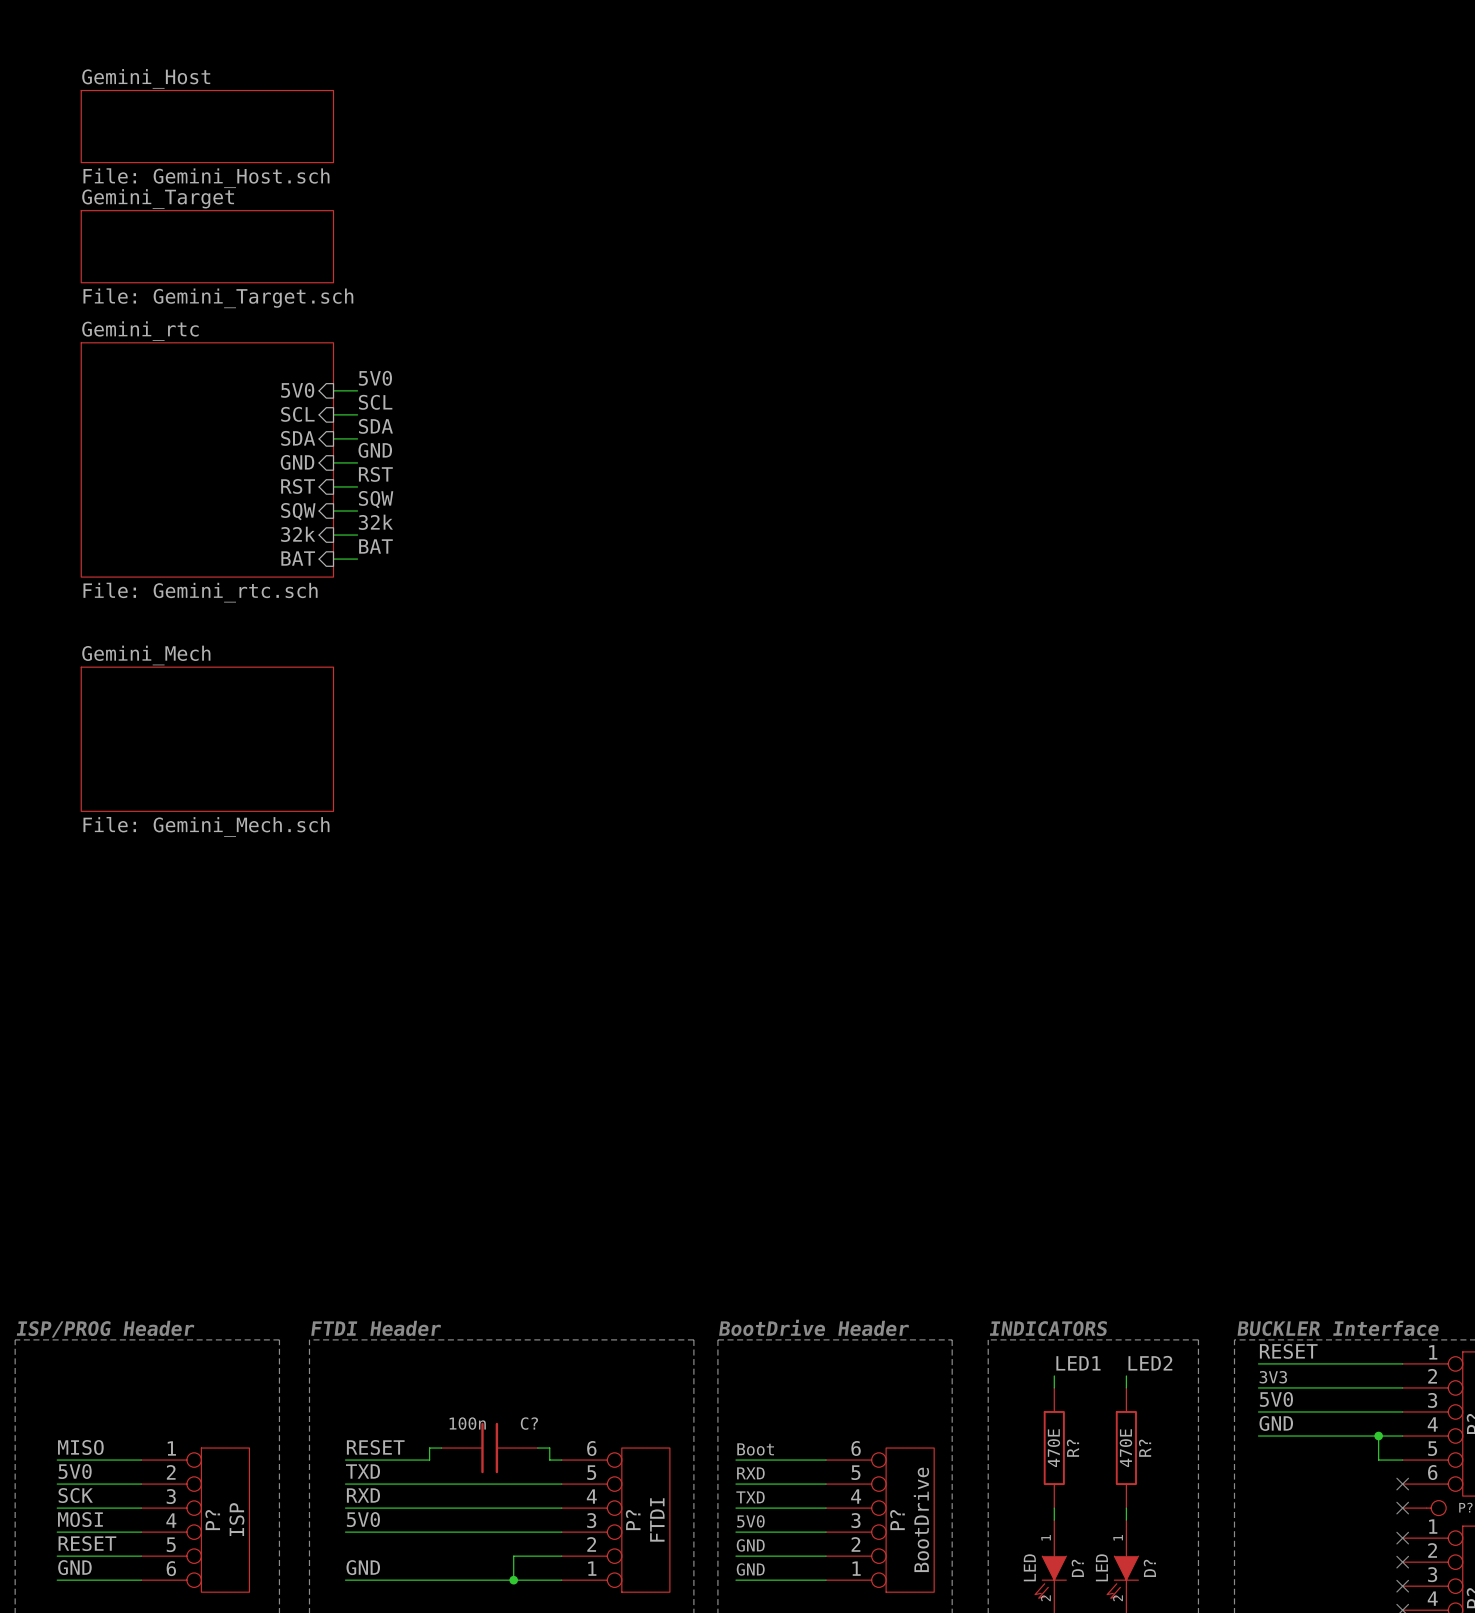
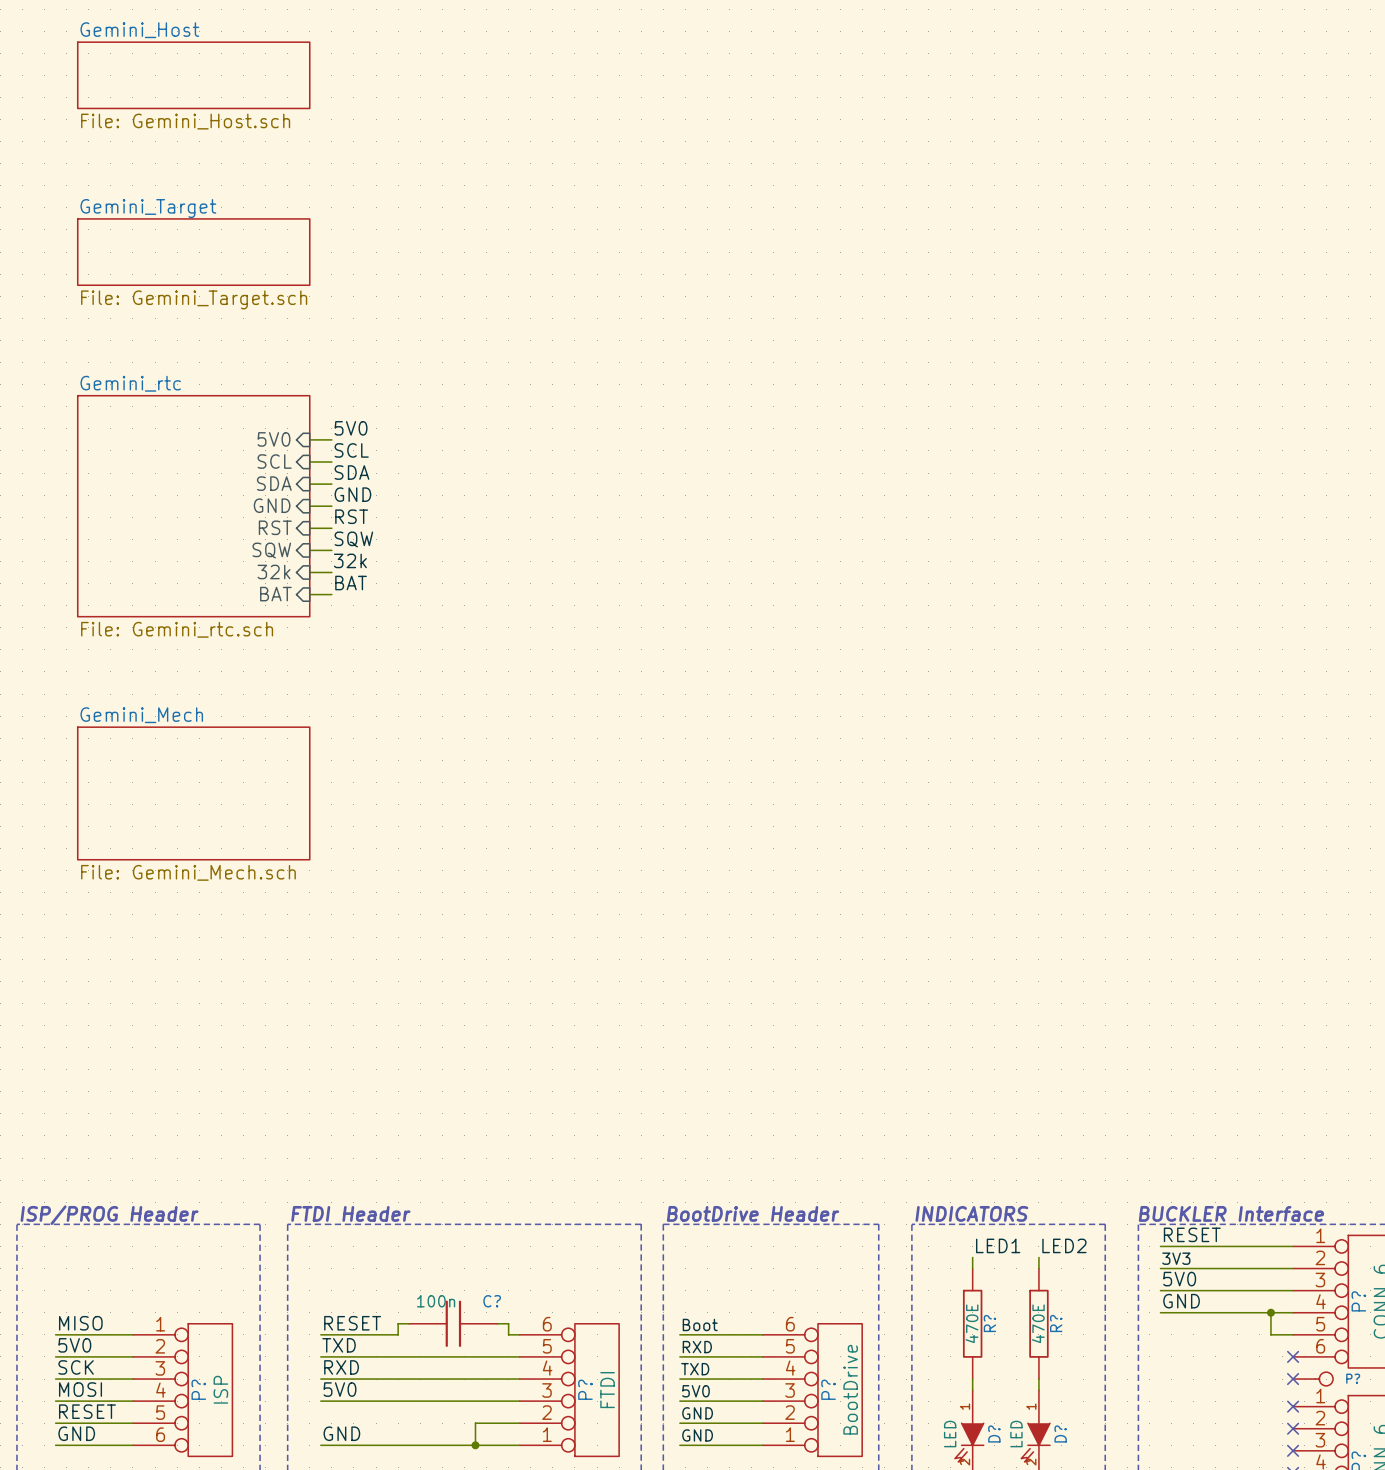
sheet Gemini_Host position: (207, 126) -> (193, 75)
sheet Gemini_Target position: (207, 246) -> (193, 252)
label: 5V0 (375, 378) -> none
sheet pin: 5V0 (297, 390) -> none
wire: (333, 390) (357, 390) -> (309, 528) (331, 528)
label: SCL (375, 402) -> none
sheet pin: SCL (297, 414) -> none
wire: (333, 414) (357, 414) -> (309, 550) (331, 550)
label: SDA (375, 426) -> none
sheet pin: SDA (298, 438) -> none
wire: (333, 438) (357, 438) -> (309, 572) (331, 572)
label: GND (375, 450) -> none
sheet Gemini_rtc: File: Gemini_rtc.sch (207, 459) -> none
sheet pin: GND (297, 462) -> none
wire: (333, 462) (357, 462) -> (309, 594) (331, 594)
label: RST (375, 474) -> 5V0 (351, 428)
sheet pin: RST (298, 486) -> 5V0 (274, 439)
label: SQW (376, 499) -> SCL (351, 450)
sheet pin: SQW (298, 511) -> SCL (274, 461)
label: 32k (375, 522) -> SDA (351, 472)
sheet pin: 32k (298, 534) -> SDA (274, 483)
label: BAT (375, 546) -> GND (352, 494)
sheet pin: BAT (298, 558) -> GND (272, 505)
sheet Gemini_rtc: none -> File: Gemini_rtc.sch (193, 506)
label: none -> RST (351, 516)
sheet pin: none -> RST (275, 527)
label: none -> SQW (353, 539)
sheet pin: none -> SQW (271, 550)
label: none -> 32k (350, 560)
sheet pin: none -> 32k (274, 571)
label: none -> BAT (351, 583)
sheet pin: none -> BAT (275, 594)
sheet Gemini_Mech position: (207, 739) -> (193, 793)

